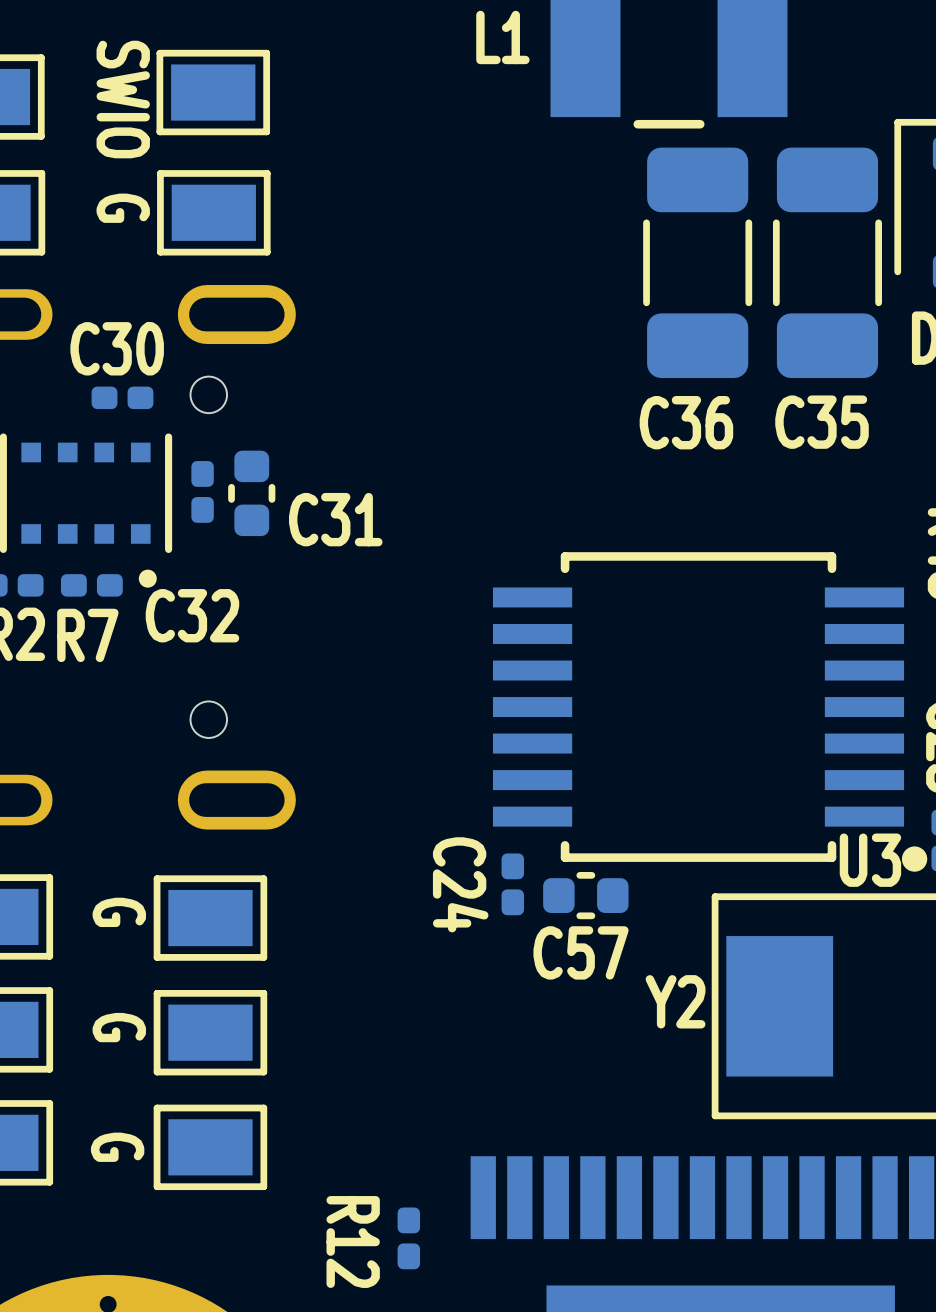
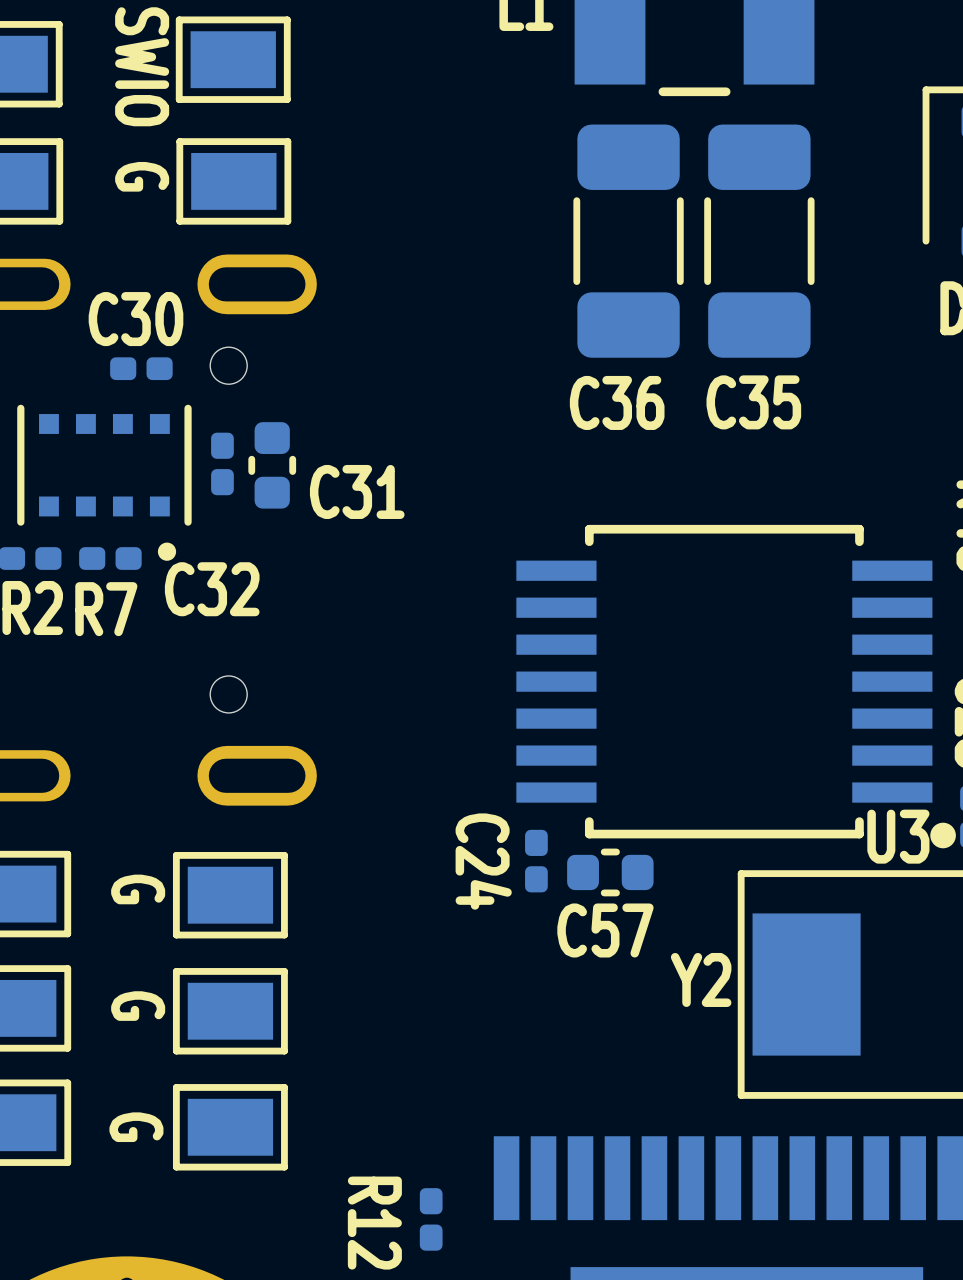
C36 position: (697, 262) -> (628, 241)
C35 position: (827, 262) -> (759, 241)

